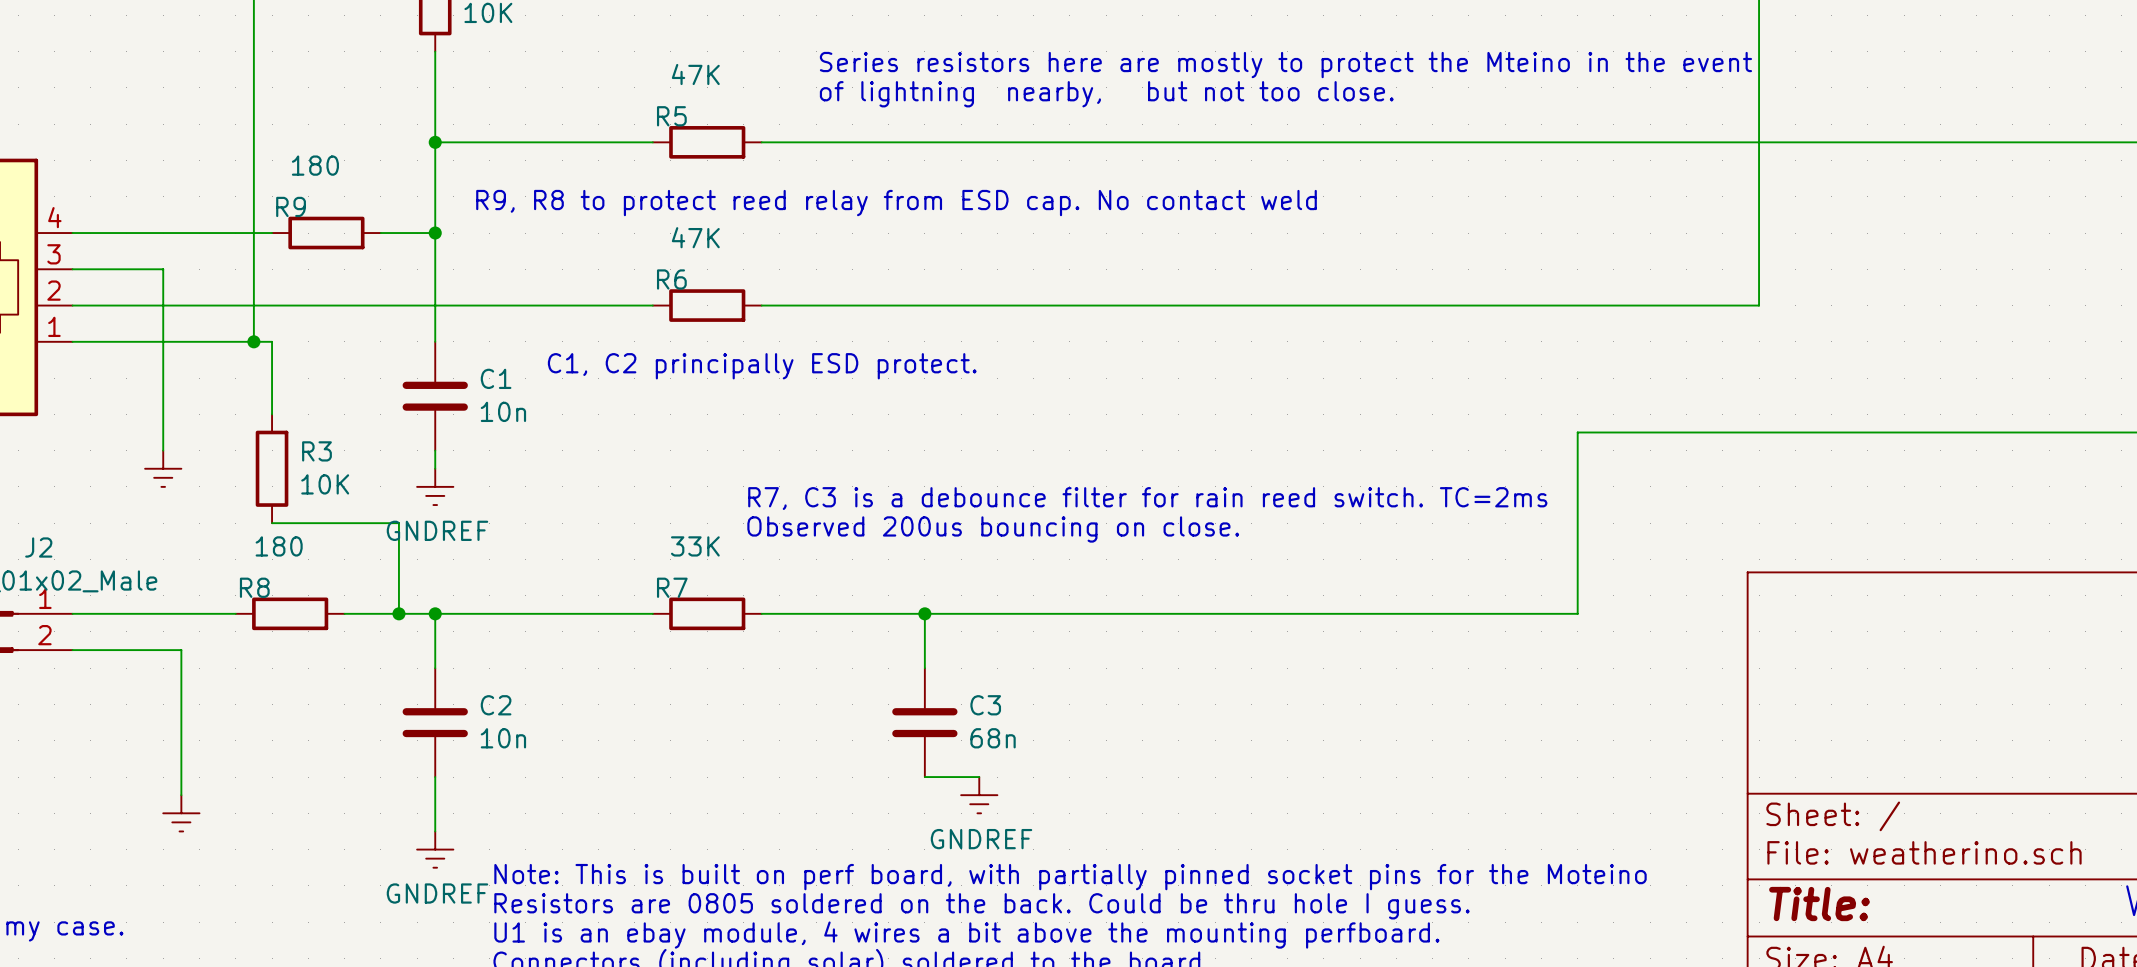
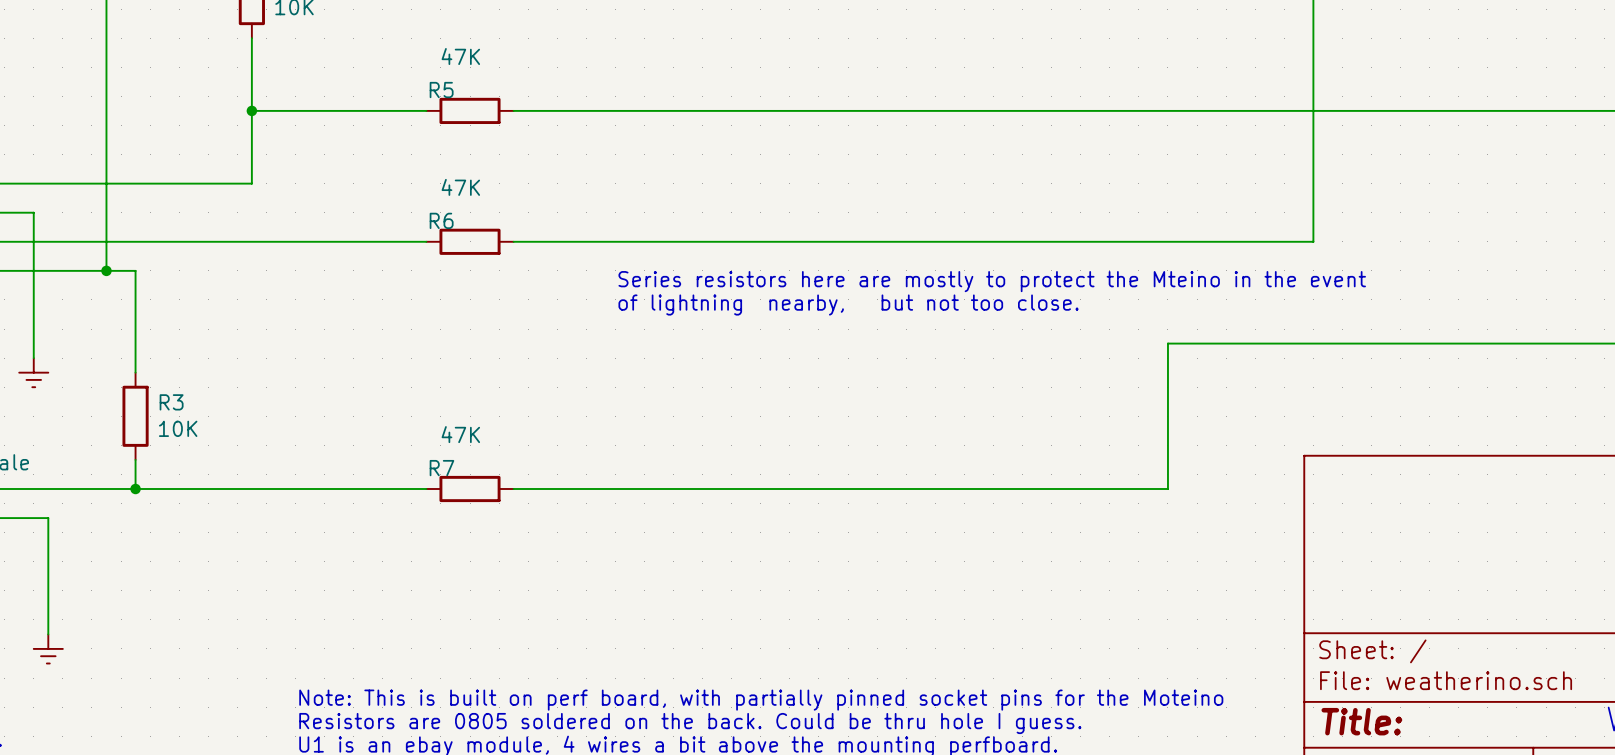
text position: Series resistors here are mostly to protect the Mteino in the event (1285, 65) -> Series resistors here are mostly to protect the Mteino in the event (992, 281)
text position: of lightning nearby, but not too close. (1106, 94) -> of lightning nearby, but not too close. (848, 305)
text: R9, R8 to protect reed relay from ESD cap. No contact weld (896, 203) -> none
wire: none -> (121, 183) (208, 183)
R9: 180 (326, 233) -> none
wire: (435, 233) (435, 341) -> none
junction: (435, 233) -> none
wire: (272, 341) (272, 414) -> (121, 270) (135, 270) (135, 372)
text: C1, C2 principally ESD protect. (762, 366) -> none
C1: 10n (435, 396) -> none
wire: (435, 450) (435, 468) -> none
R3 position: (272, 468) -> (135, 416)
power symbol: GNDREF (435, 486) -> none
text: R7, C3 is a debounce filter for rain reed switch. TC=2ms (1147, 498) -> none
wire: (272, 523) (398, 523) (398, 613) -> none
text: Observed 200us bouncing on close. (993, 529) -> none
R7 value: 33K (695, 546) -> 47K (460, 434)
wire: none -> (135, 459) (135, 488)
wire: none -> (91, 488) (179, 488)
R8: 180 (290, 613) -> none
junction: none -> (135, 488)
junction: (398, 613) -> none
wire: (435, 613) (435, 668) -> none
junction: (435, 613) -> none
wire: (924, 613) (924, 668) -> none
junction: (924, 613) -> none
C2: 10n (435, 722) -> none
C3: 68n (924, 722) -> none
wire: (435, 777) (435, 831) -> none
wire: (924, 777) (979, 777) -> none
power symbol: GNDREF (979, 795) -> none
power symbol: GNDREF (435, 849) -> none

